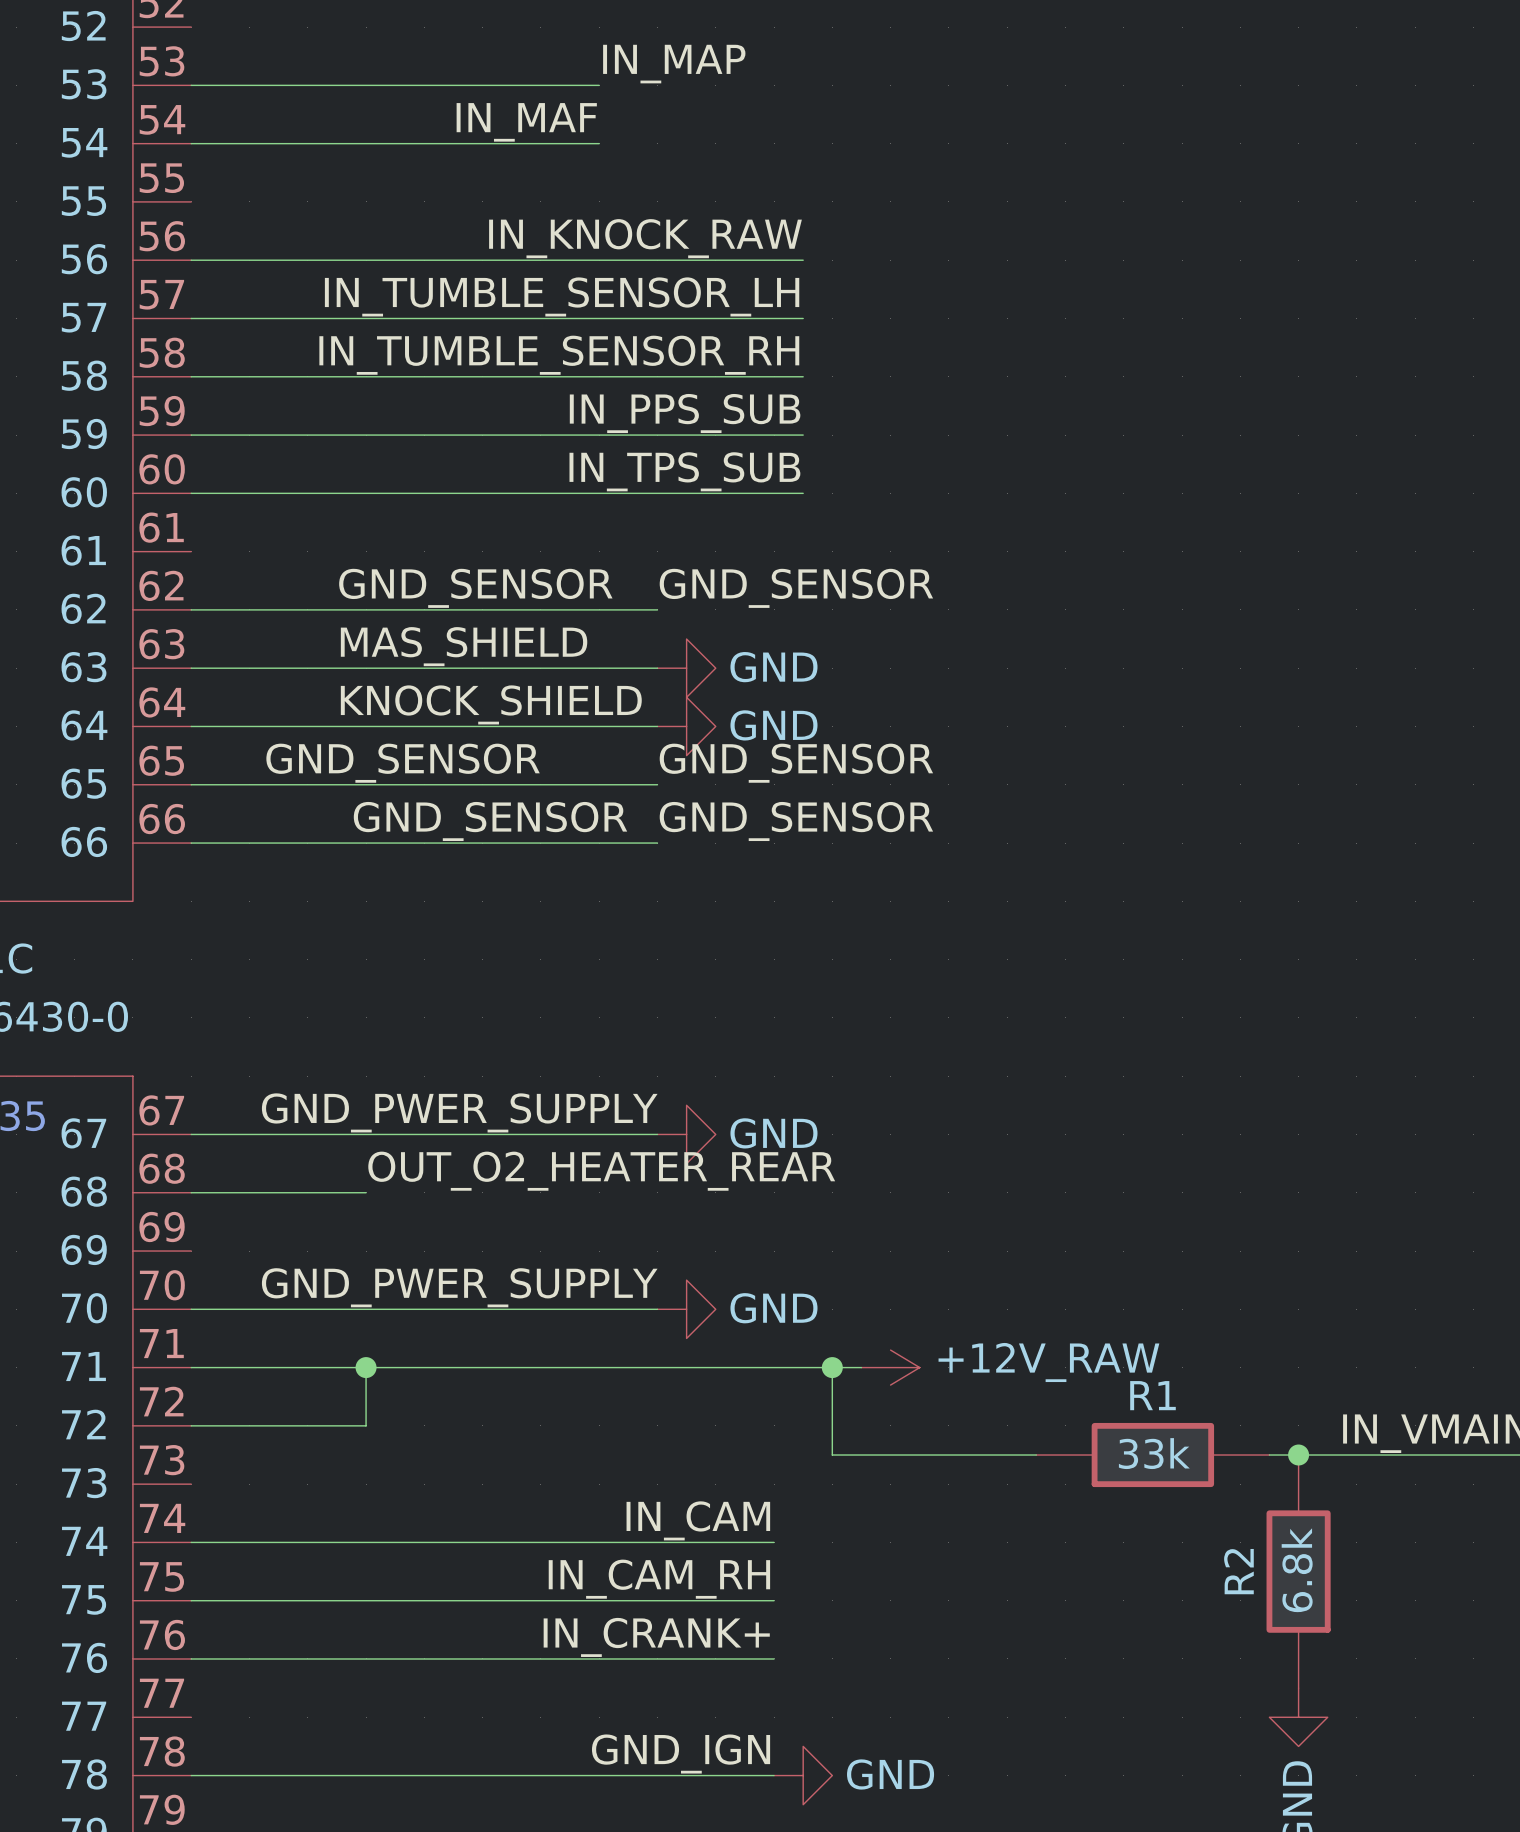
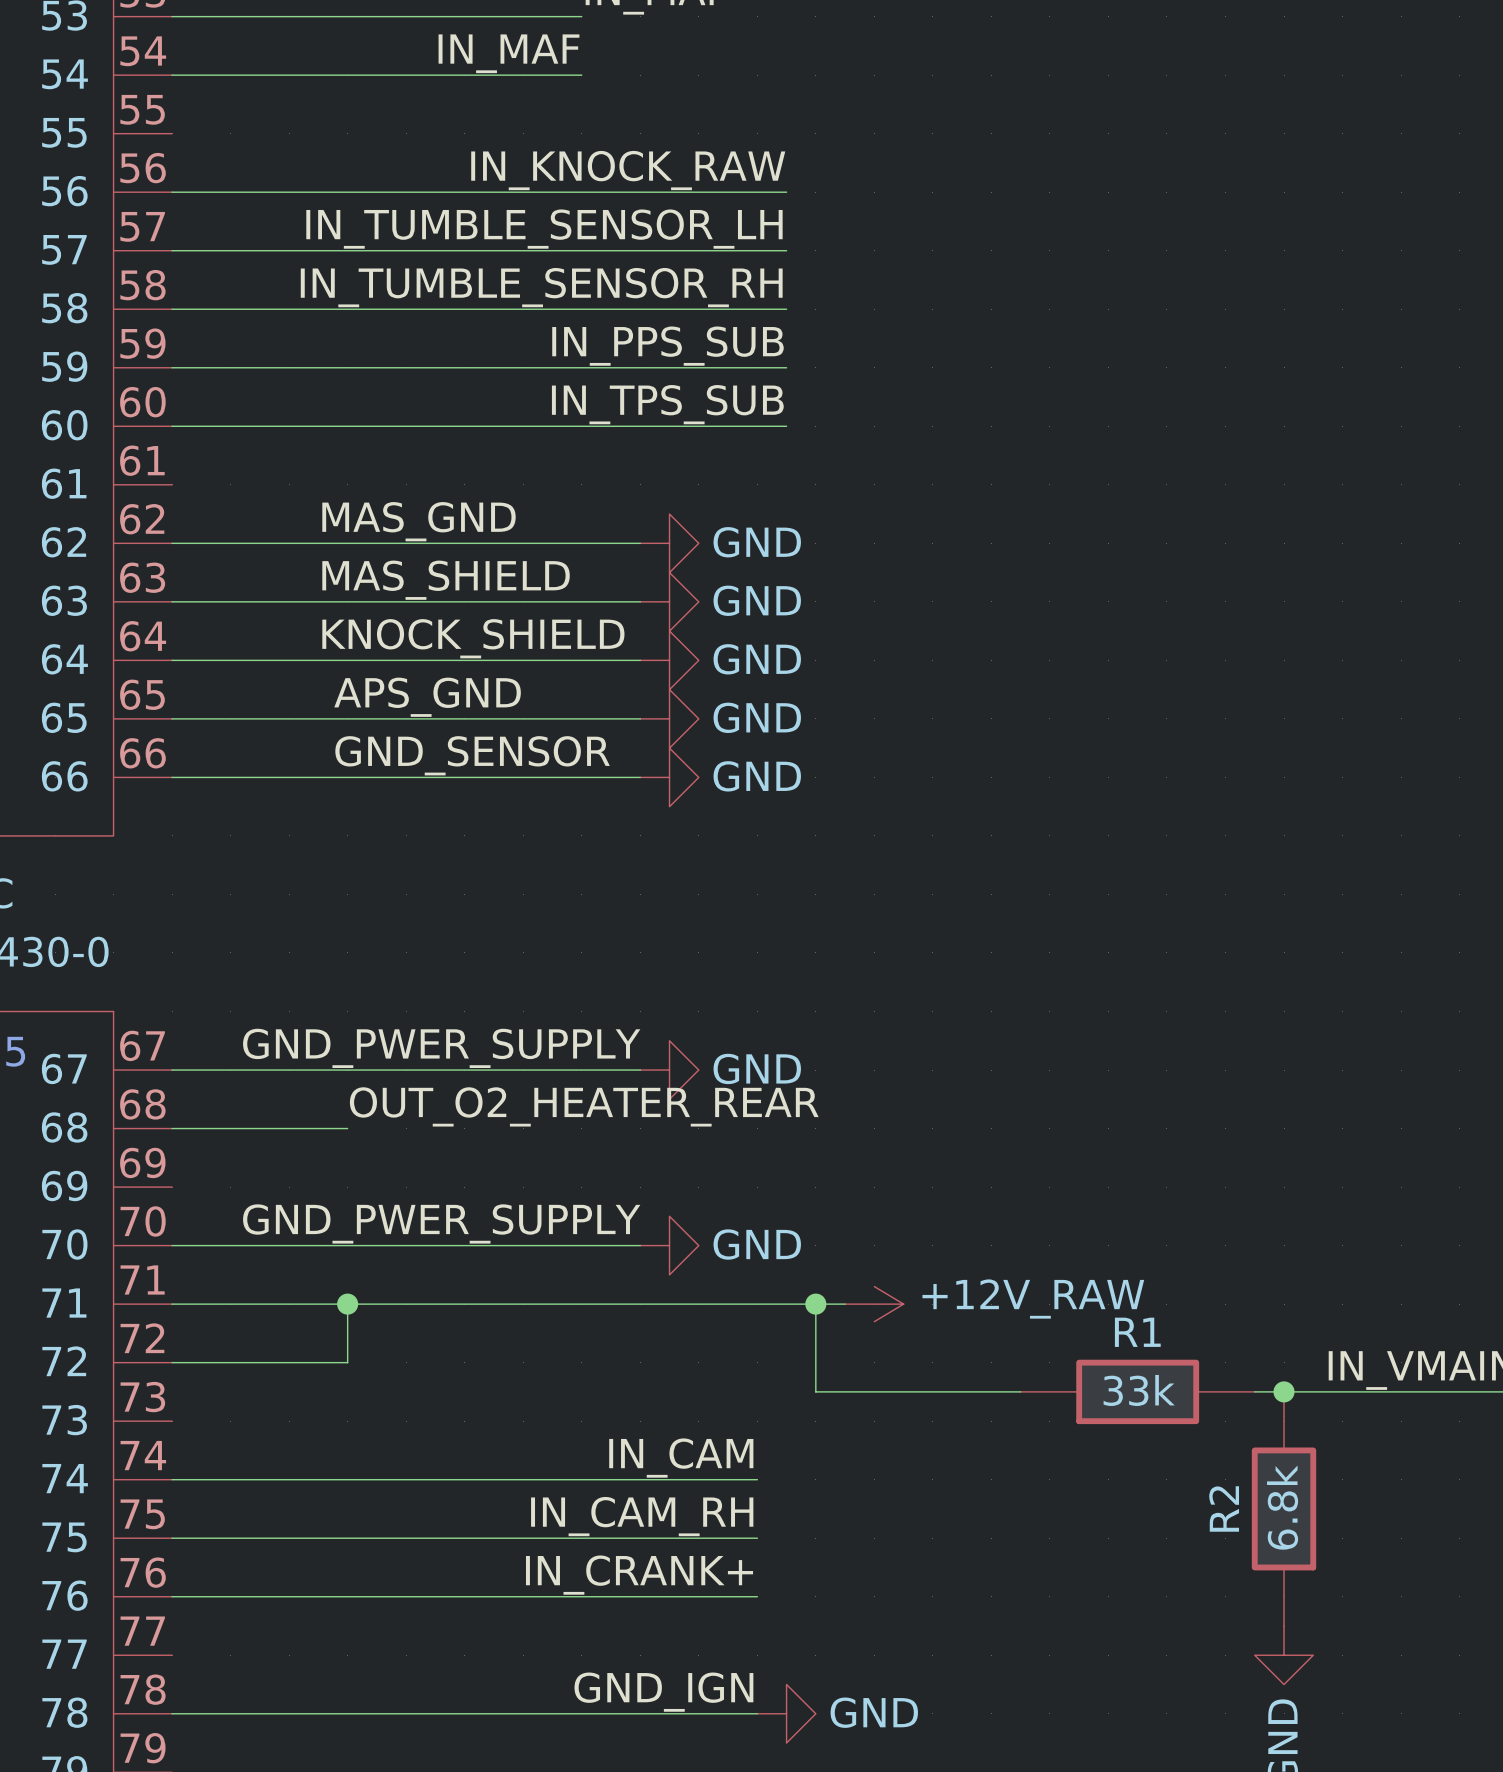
label: GND_SENSOR (475, 588) -> MAS_GND (418, 521)
label: GND_SENSOR (796, 588) -> none
power symbol: none -> GND (669, 543)
label: GND_SENSOR (403, 763) -> APS_GND (427, 697)
label: GND_SENSOR (796, 763) -> none
power symbol: none -> GND (669, 718)
label: GND_SENSOR (796, 821) -> none
power symbol: none -> GND (669, 777)

